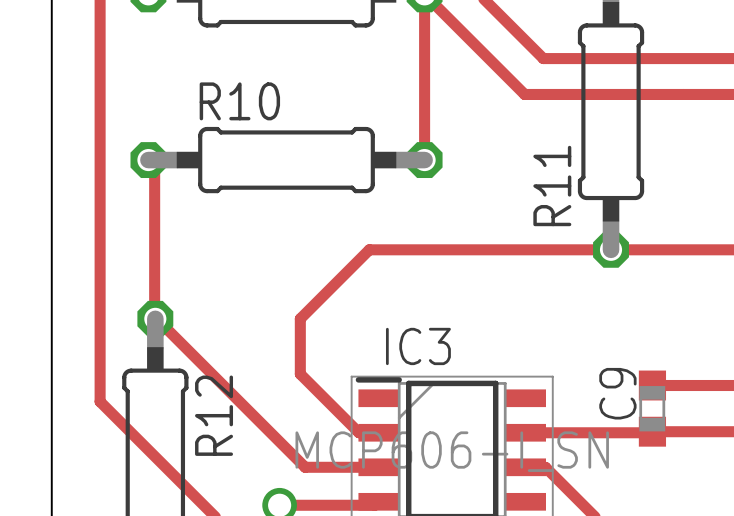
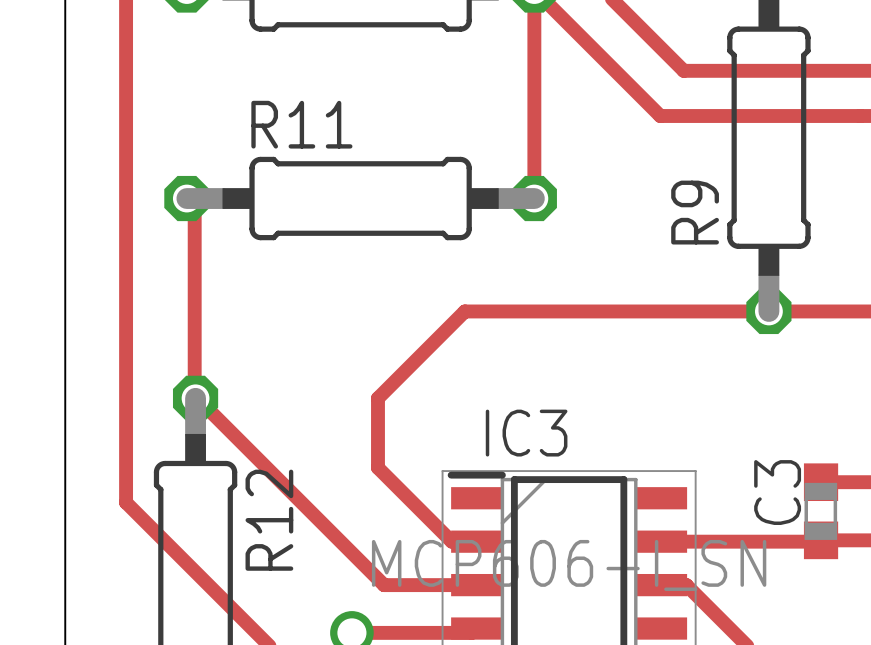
R10 name: R10 (239, 101) -> R11 (301, 124)
R11 name: R11 (552, 186) -> R9 (695, 212)
C9 name: C9 (617, 393) -> C3 (777, 492)

